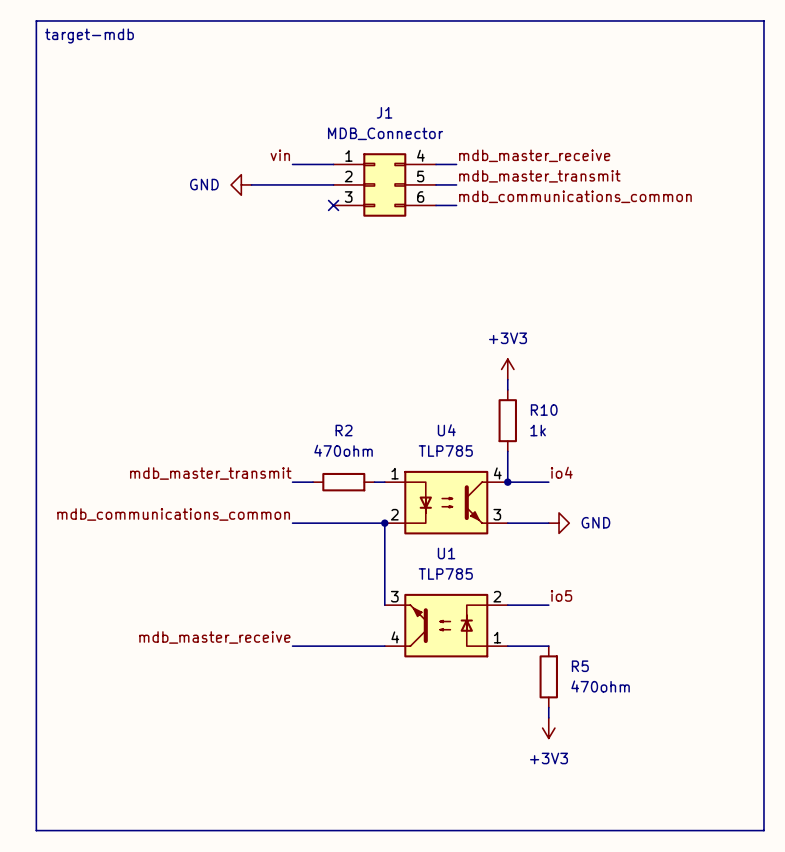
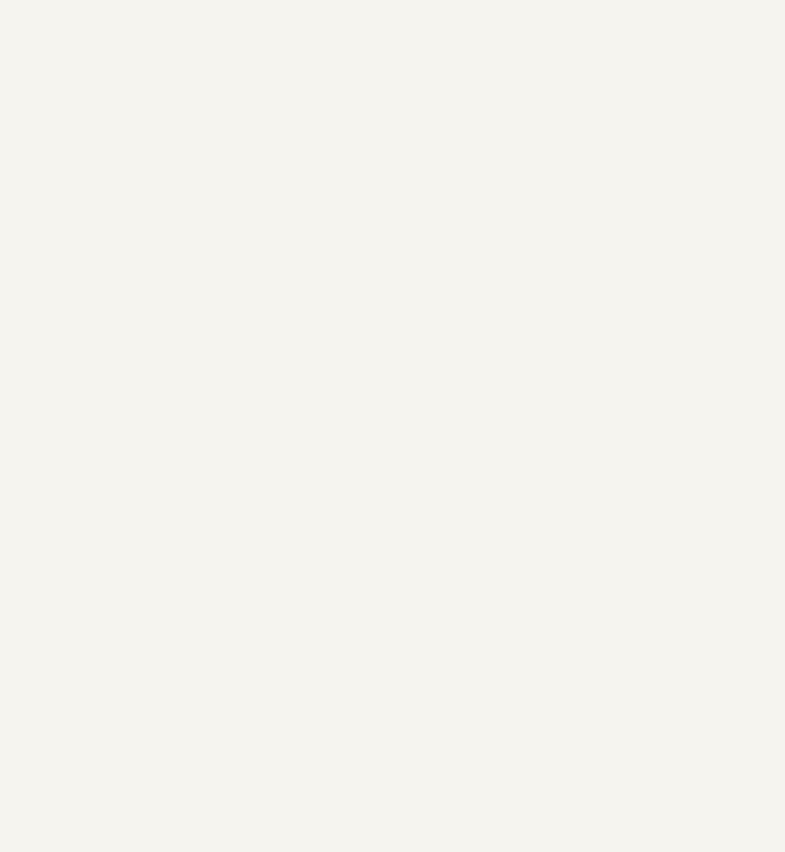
line: (36, 20) (763, 20) (763, 830) (36, 830) (36, 20) -> none
text: target-mdb (89, 35) -> none
label: vin (280, 155) -> none
label: mdb_master_receive (534, 155) -> none
wire: (292, 164) (333, 164) -> none
wire: (436, 164) (456, 164) -> none
label: mdb_master_transmit (539, 176) -> none
power symbol: GND (241, 184) -> none
wire: (251, 184) (333, 184) -> none
J1: MDB_Connector (384, 184) -> none
wire: (436, 184) (456, 184) -> none
label: mdb_communications_common (575, 196) -> none
no-connect mark: (333, 205) -> none
wire: (436, 205) (456, 205) -> none
power symbol: +3V3 (507, 369) -> none
wire: (507, 379) (507, 389) -> none
R10: 1k (507, 420) -> none
wire: (507, 451) (507, 482) (548, 482) -> none
label: io4 (561, 472) -> none
label: mdb_master_transmit (210, 473) -> none
wire: (292, 482) (313, 482) -> none
R2: 470ohm (343, 482) -> none
wire: (374, 482) (384, 482) -> none
junction: (507, 482) -> none
U4: TLP785 (446, 502) -> none
label: mdb_communications_common (173, 514) -> none
wire: (292, 523) (384, 523) (384, 605) -> none
junction: (384, 523) -> none
wire: (507, 523) (548, 523) -> none
power symbol: GND (559, 523) -> none
label: io5 (561, 595) -> none
wire: (507, 605) (548, 605) -> none
U1: TLP785 (446, 625) -> none
label: mdb_master_receive (214, 637) -> none
wire: (292, 646) (384, 646) -> none
wire: (507, 646) (548, 646) -> none
R5: 470ohm (548, 676) -> none
wire: (548, 707) (548, 717) -> none
power symbol: +3V3 (548, 728) -> none

